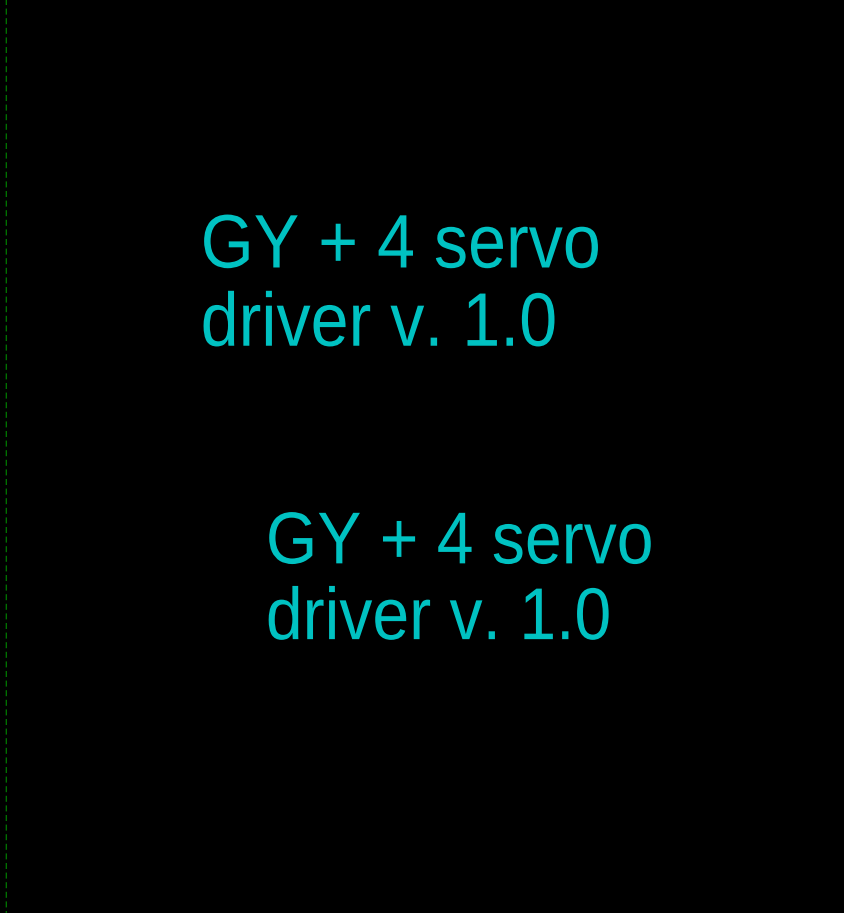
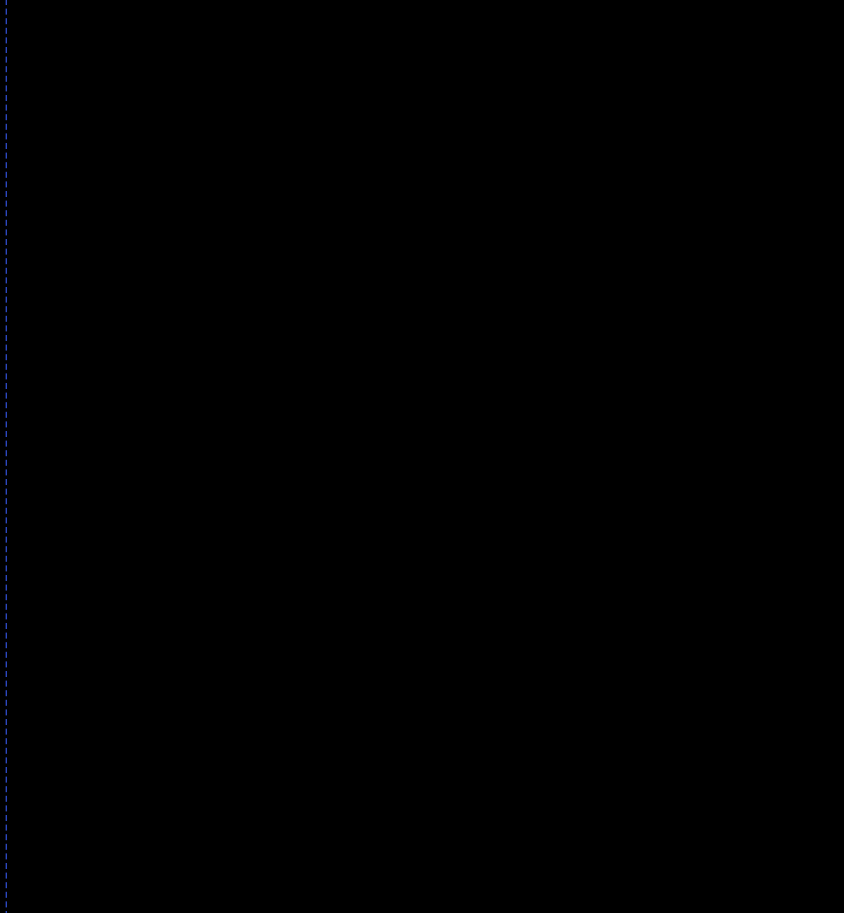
text: GY + 4 servo (401, 241) -> none
text: driver v. 1.0 (379, 318) -> none
text: GY + 4 servo (459, 538) -> none
text: driver v. 1.0 (438, 612) -> none

